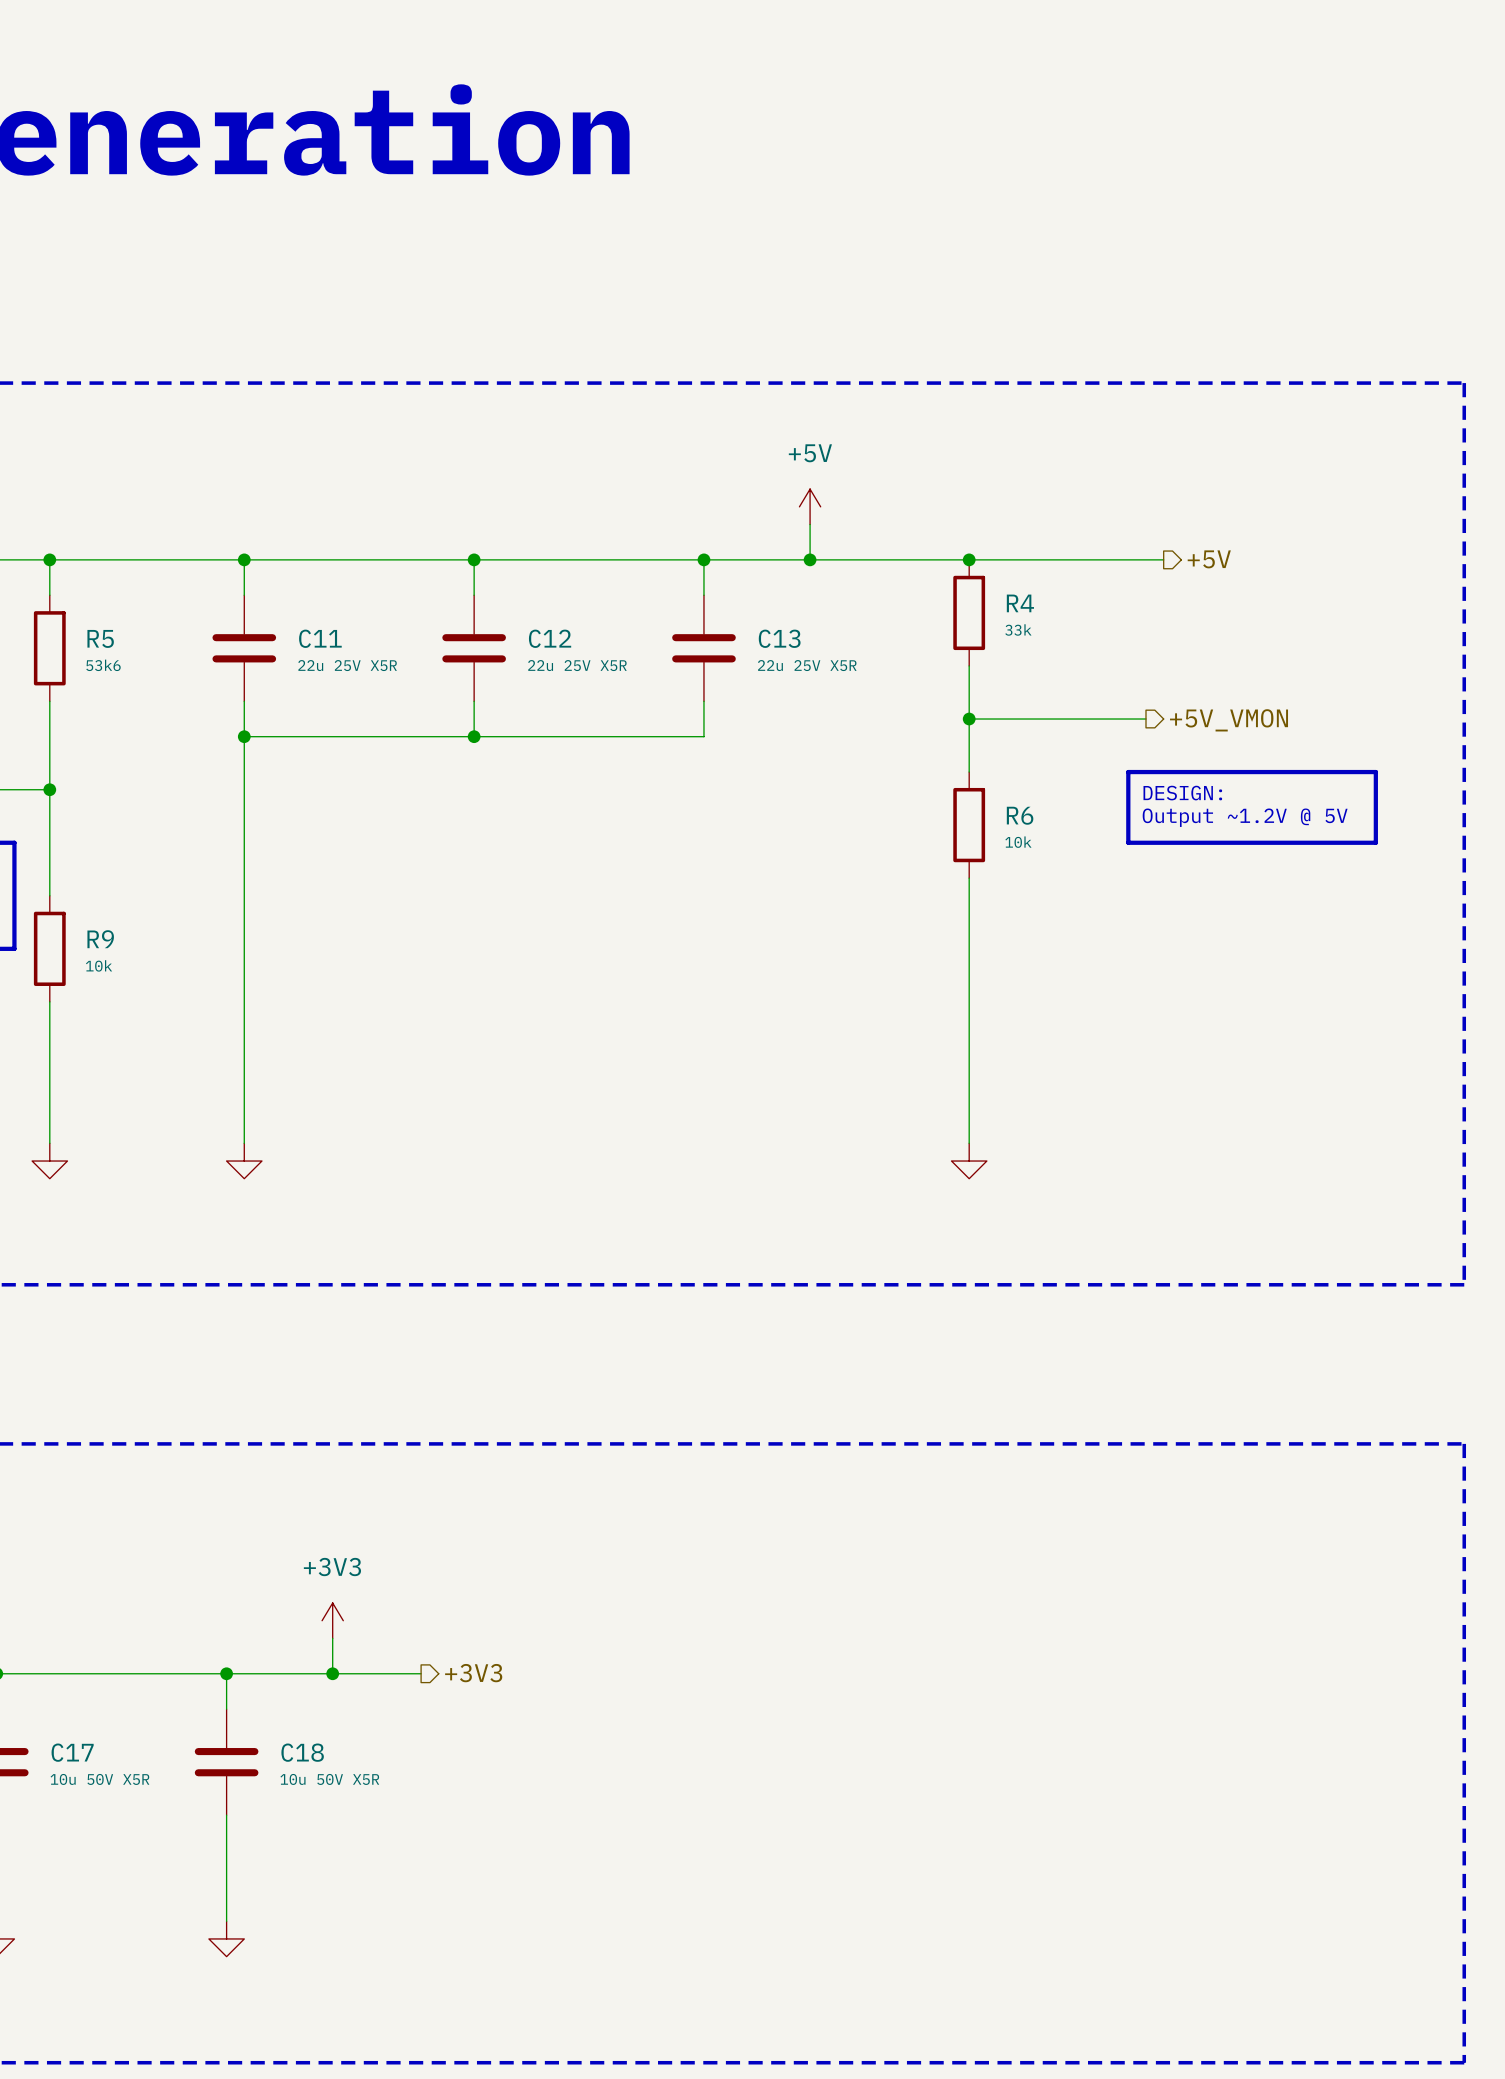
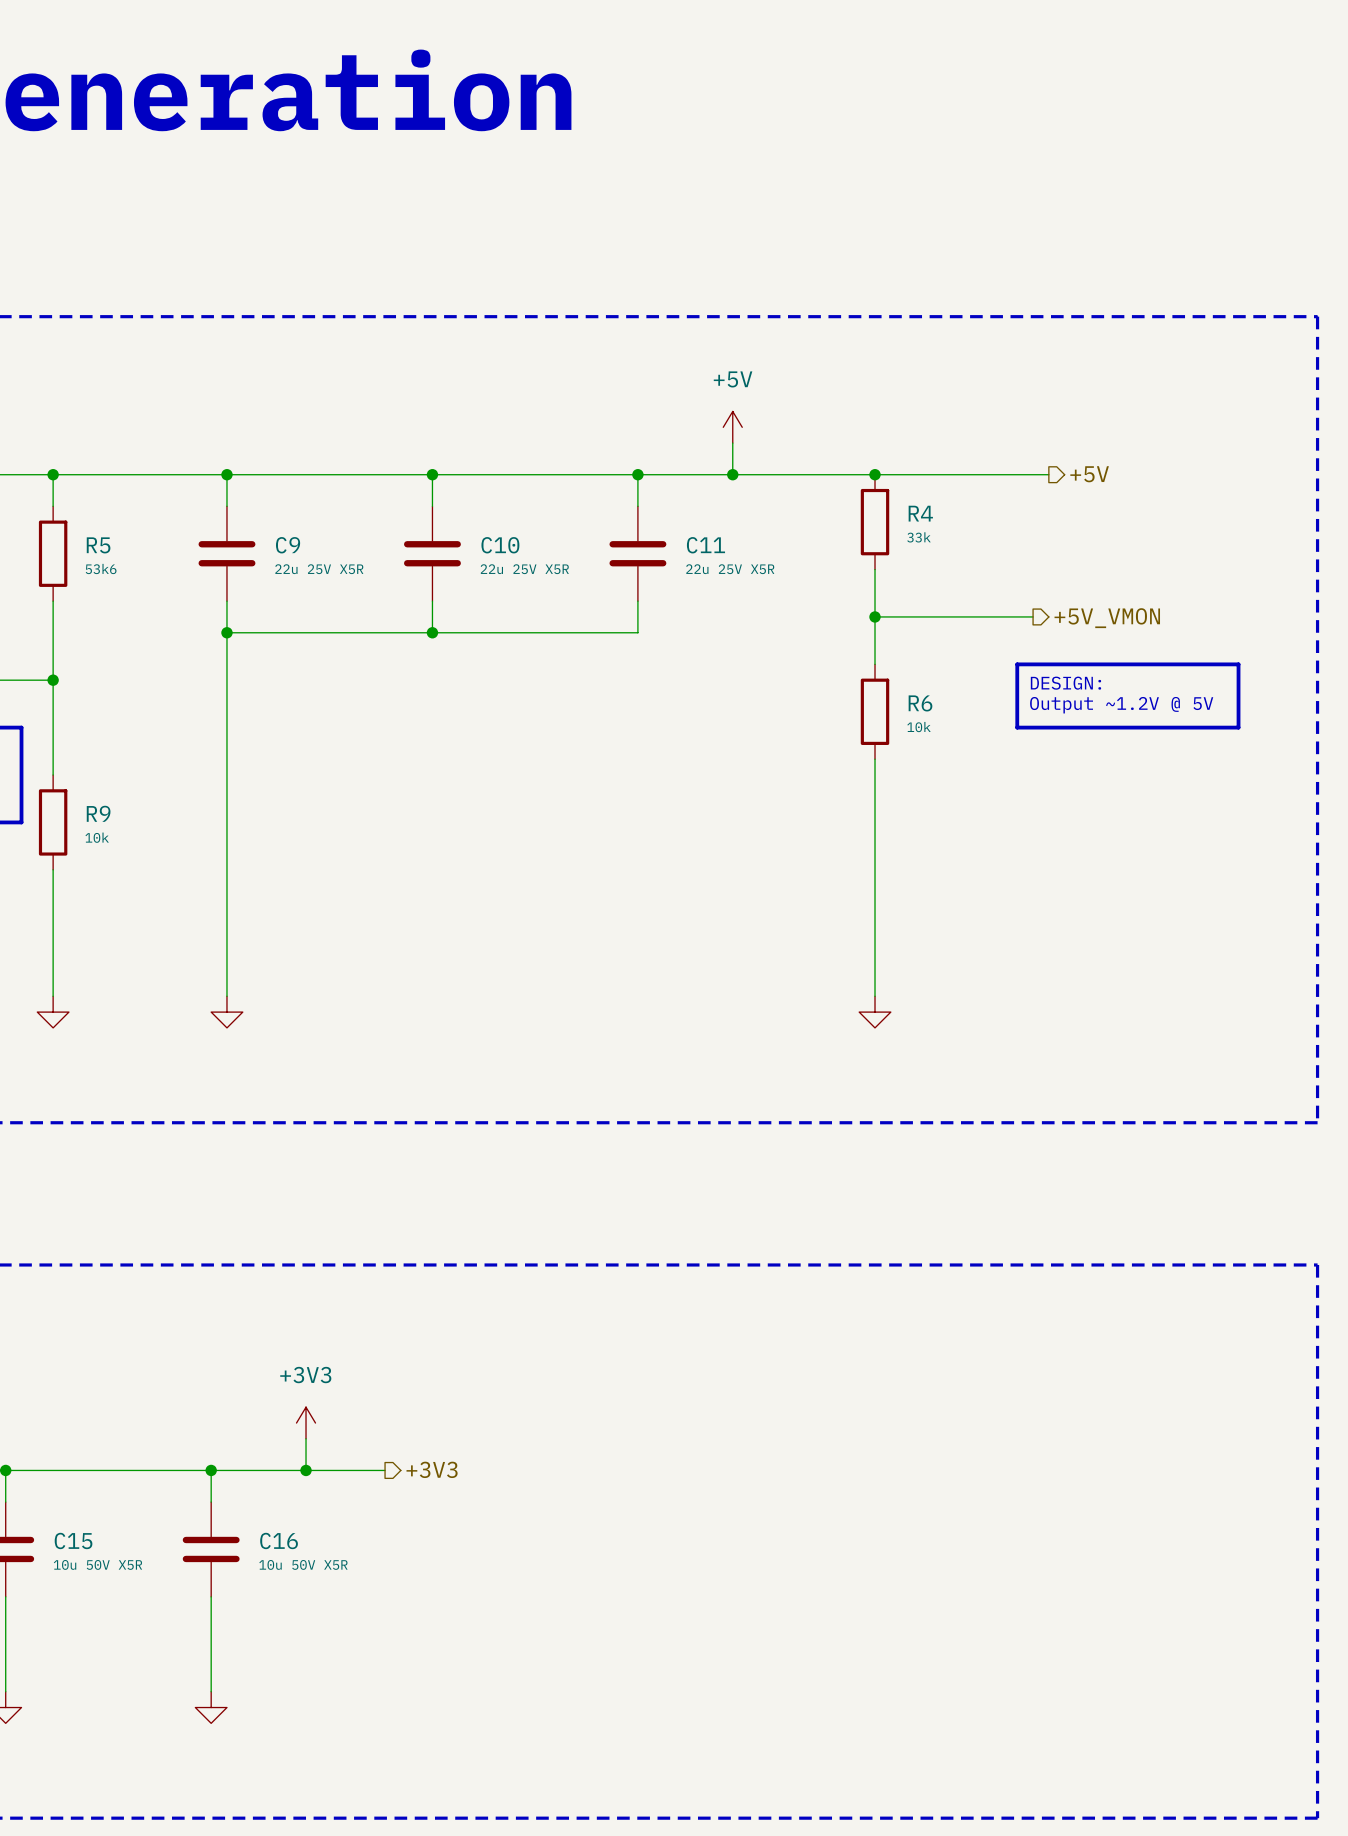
C11 name: C11 (320, 638) -> C9 (288, 545)
C12 name: C12 (550, 638) -> C10 (500, 545)
C13 name: C13 (779, 638) -> C11 (705, 545)
C17 name: C17 (72, 1752) -> C15 (73, 1540)
C18 name: C18 (302, 1752) -> C16 (279, 1540)

